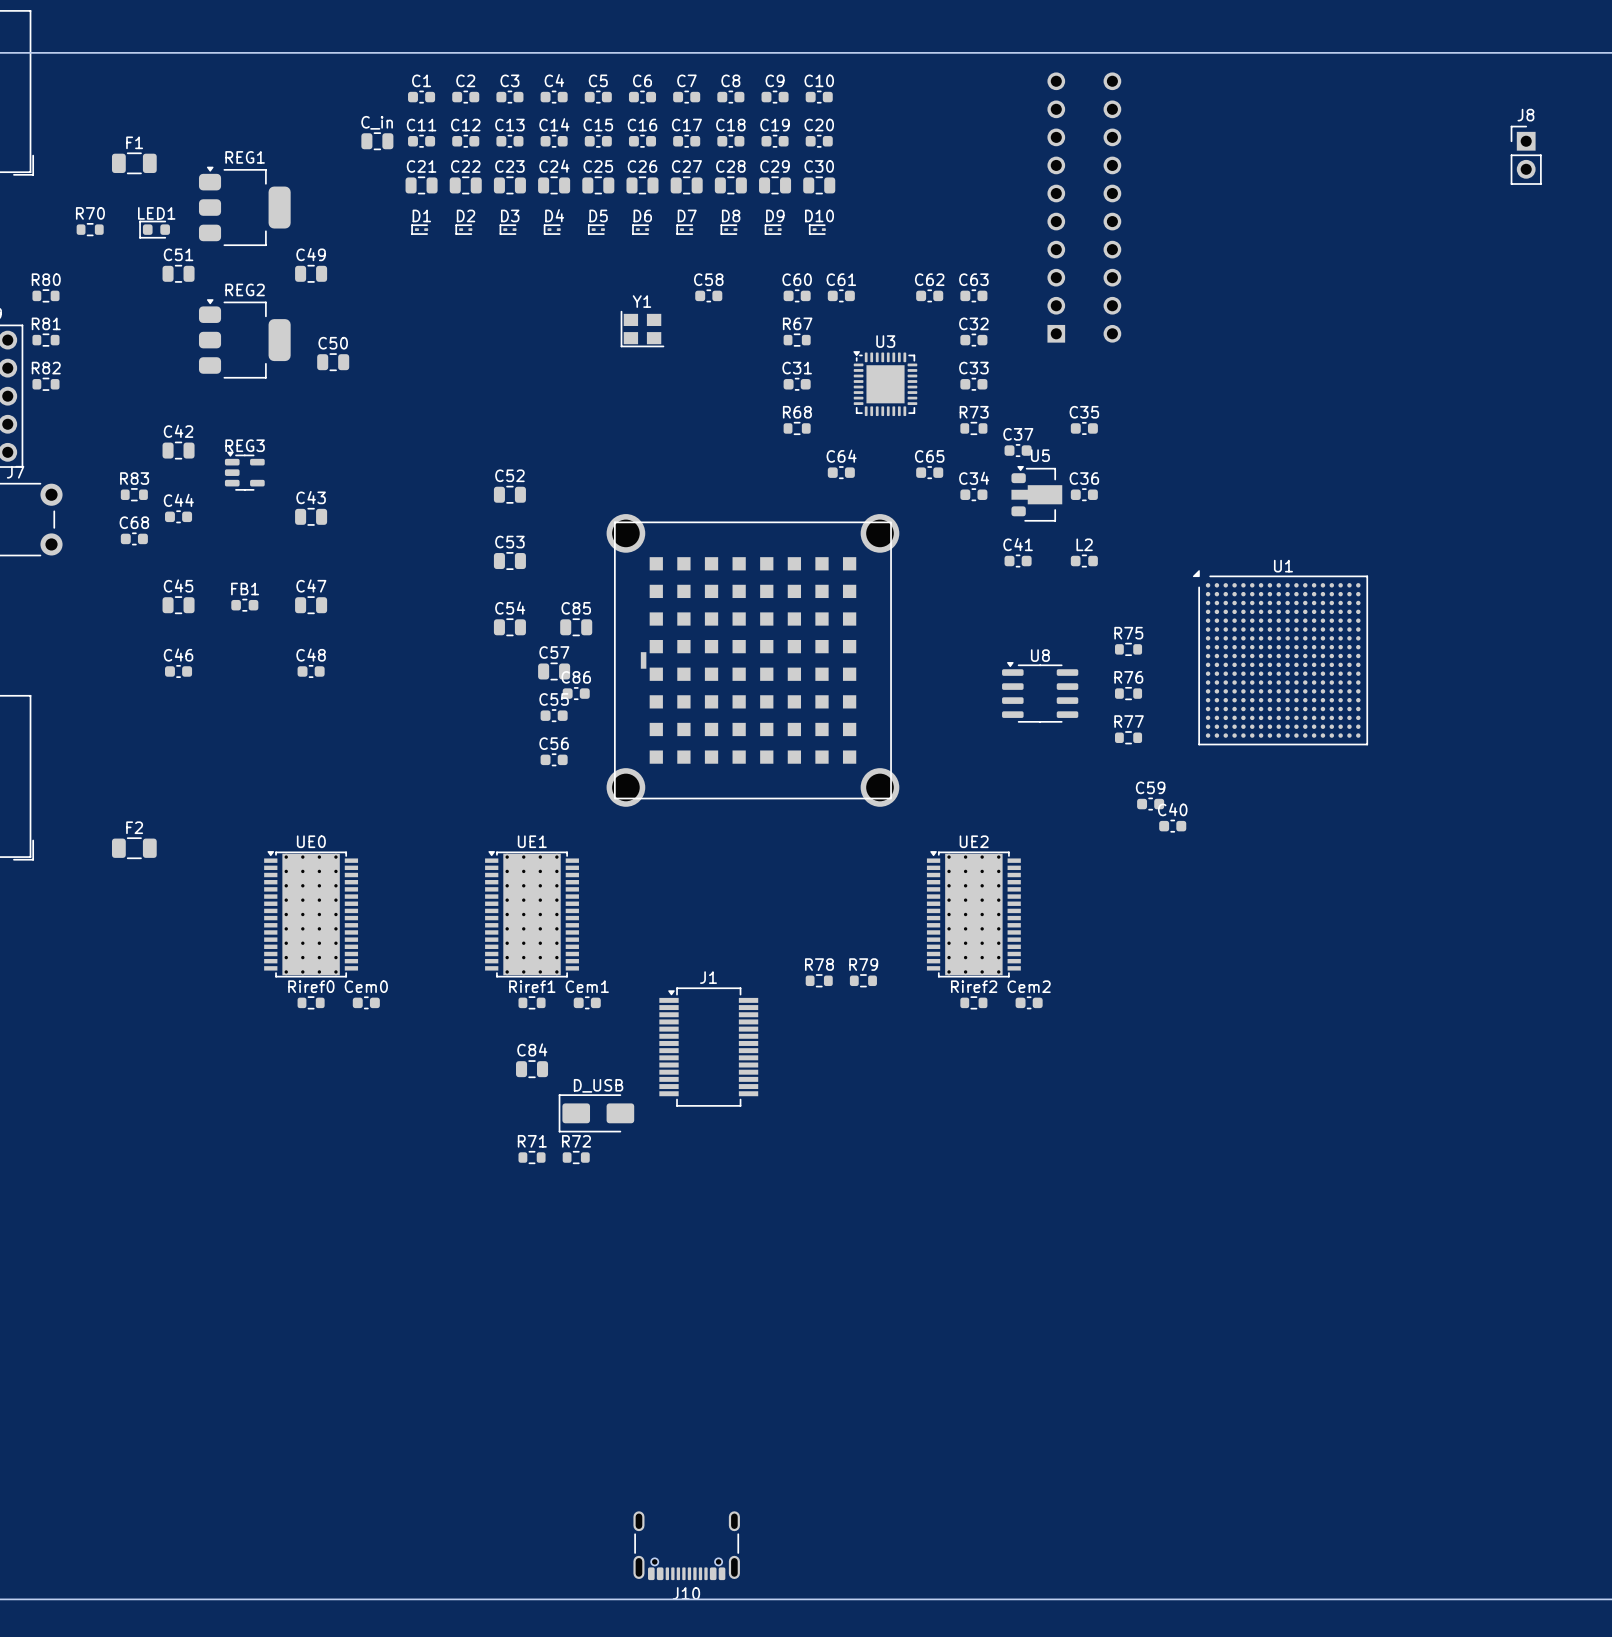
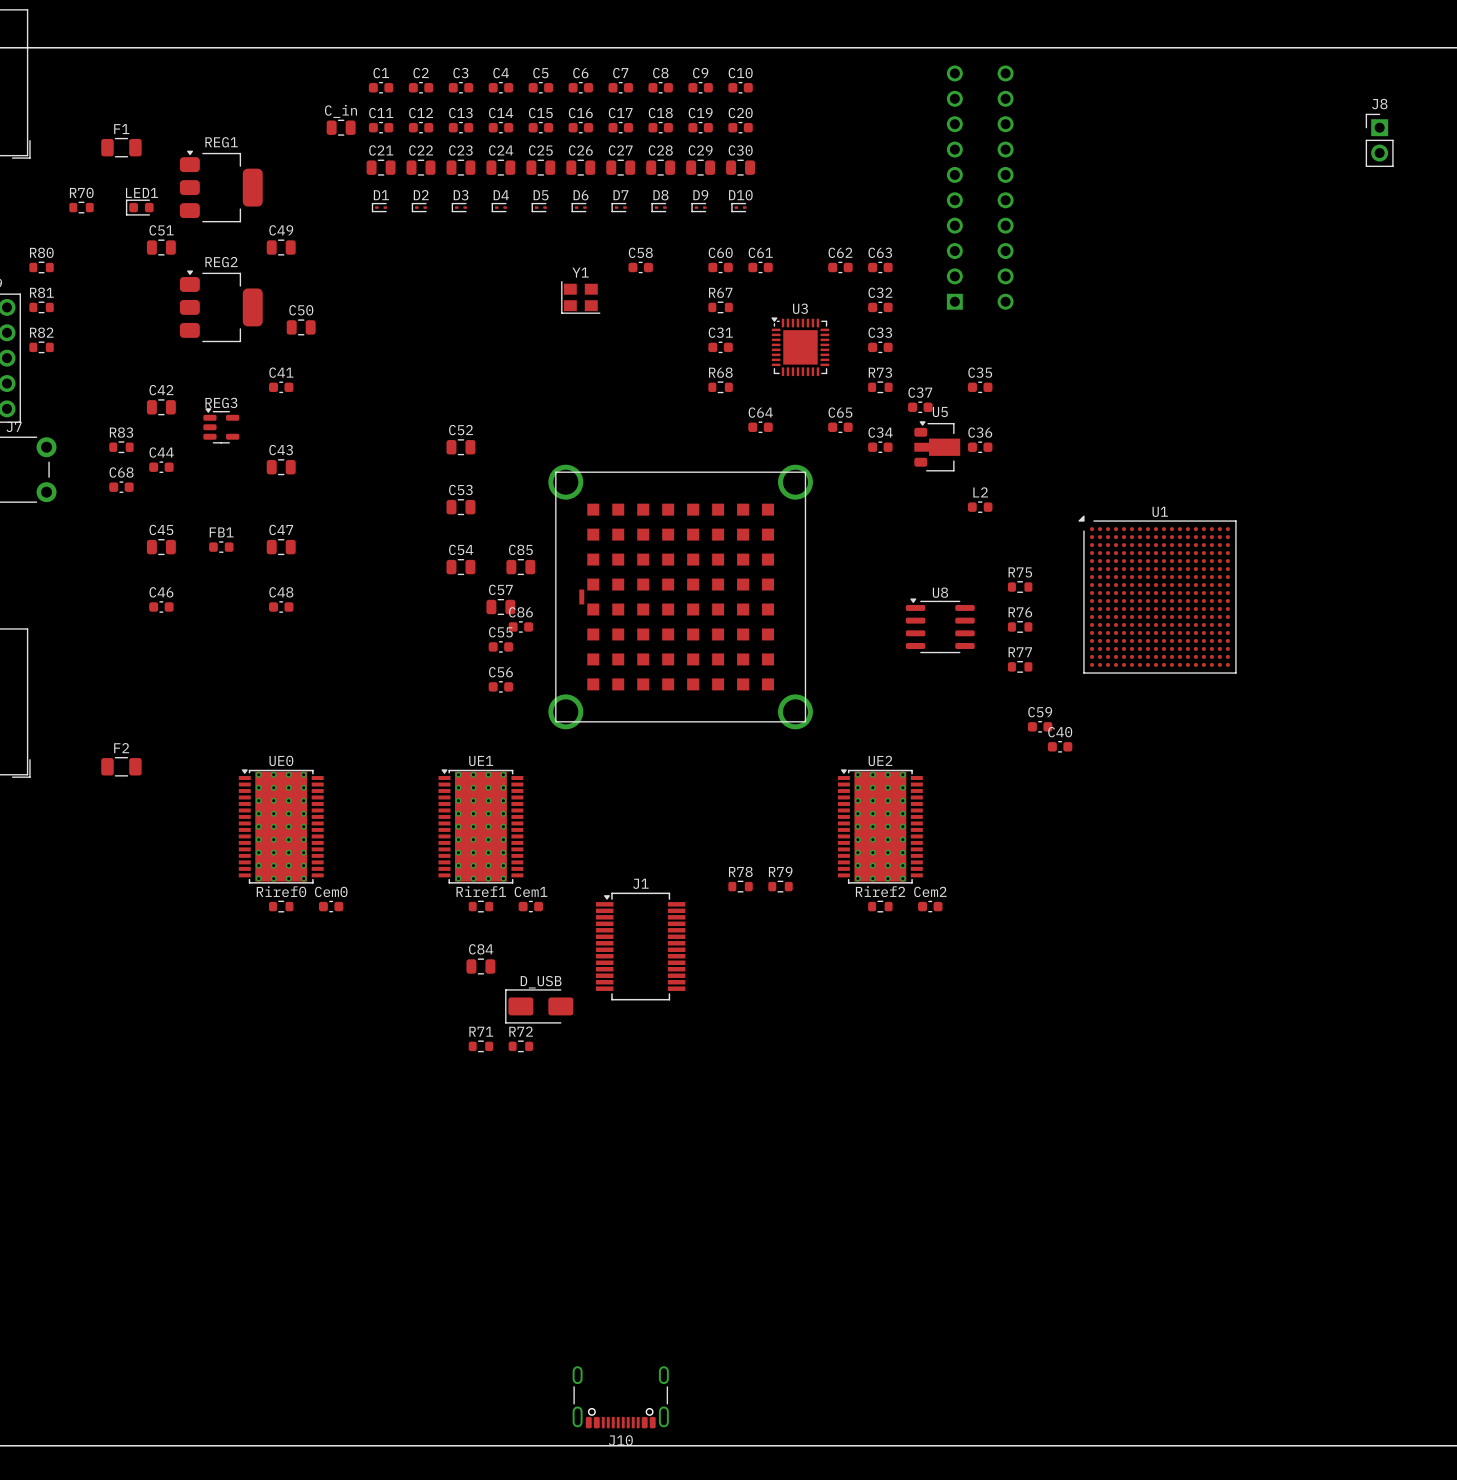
C41 position: (1018, 561) -> (281, 387)

